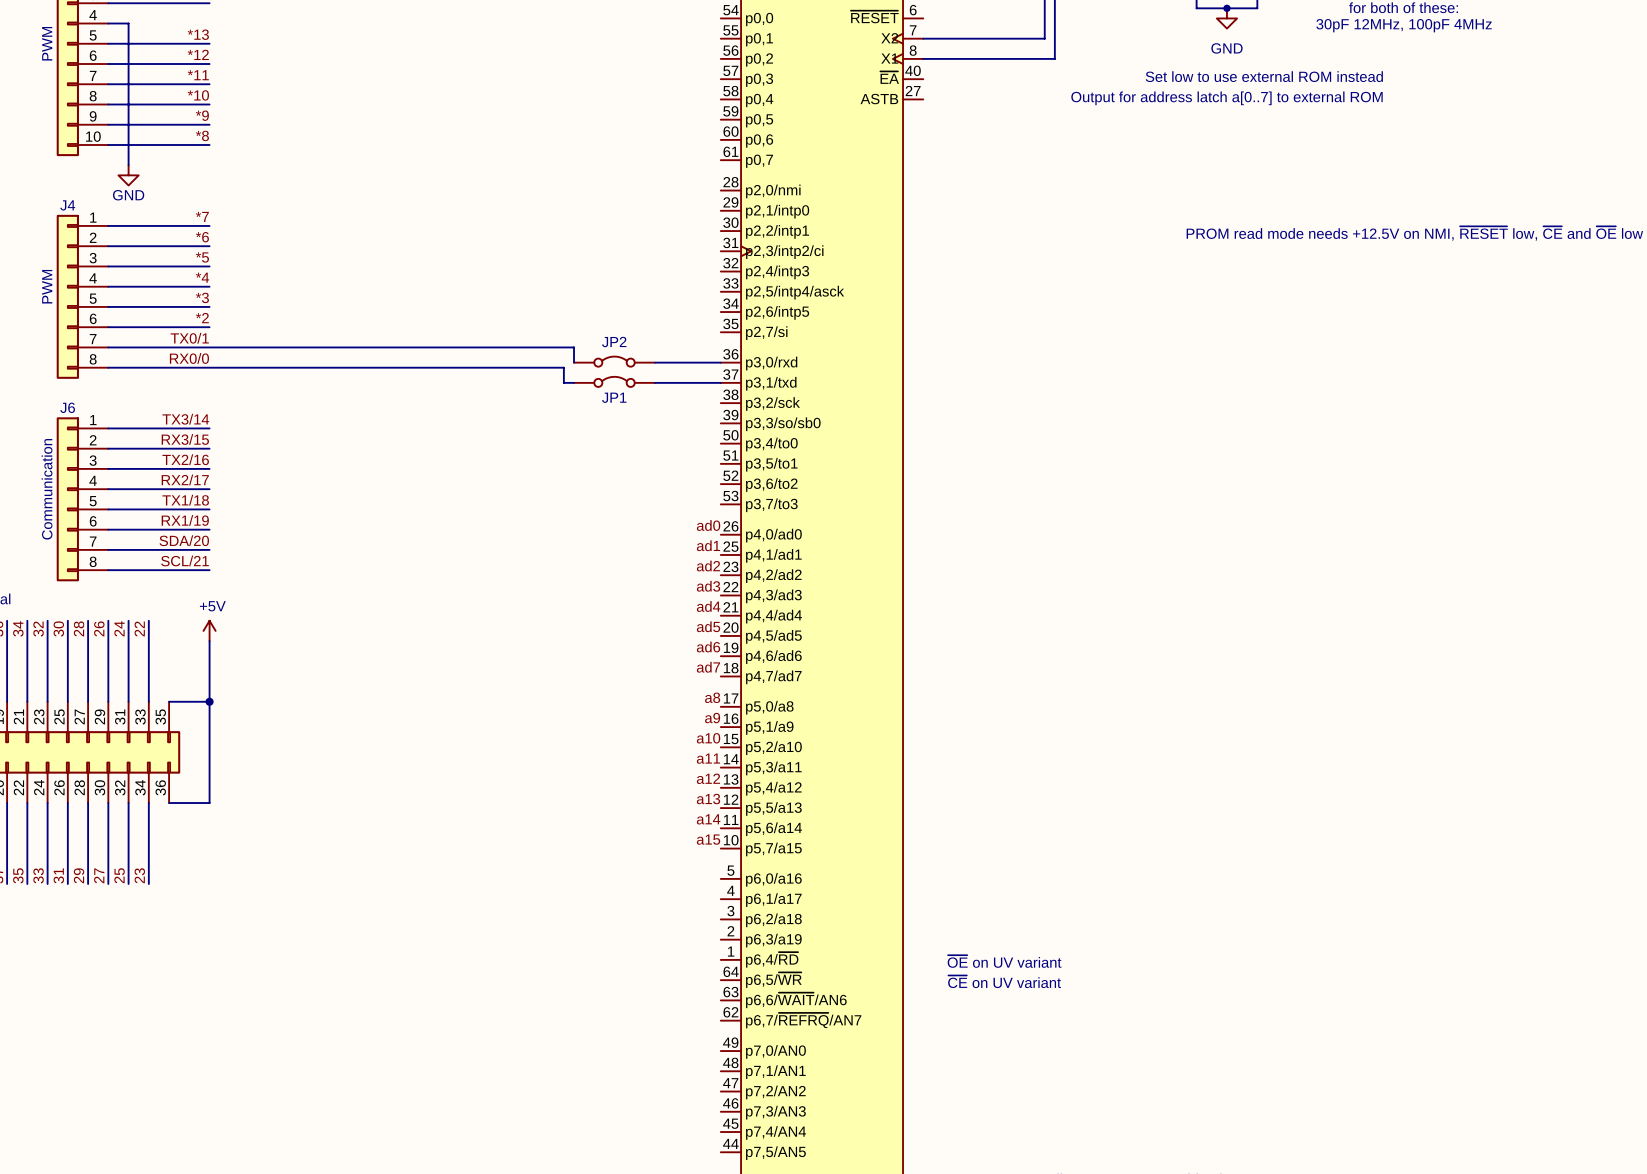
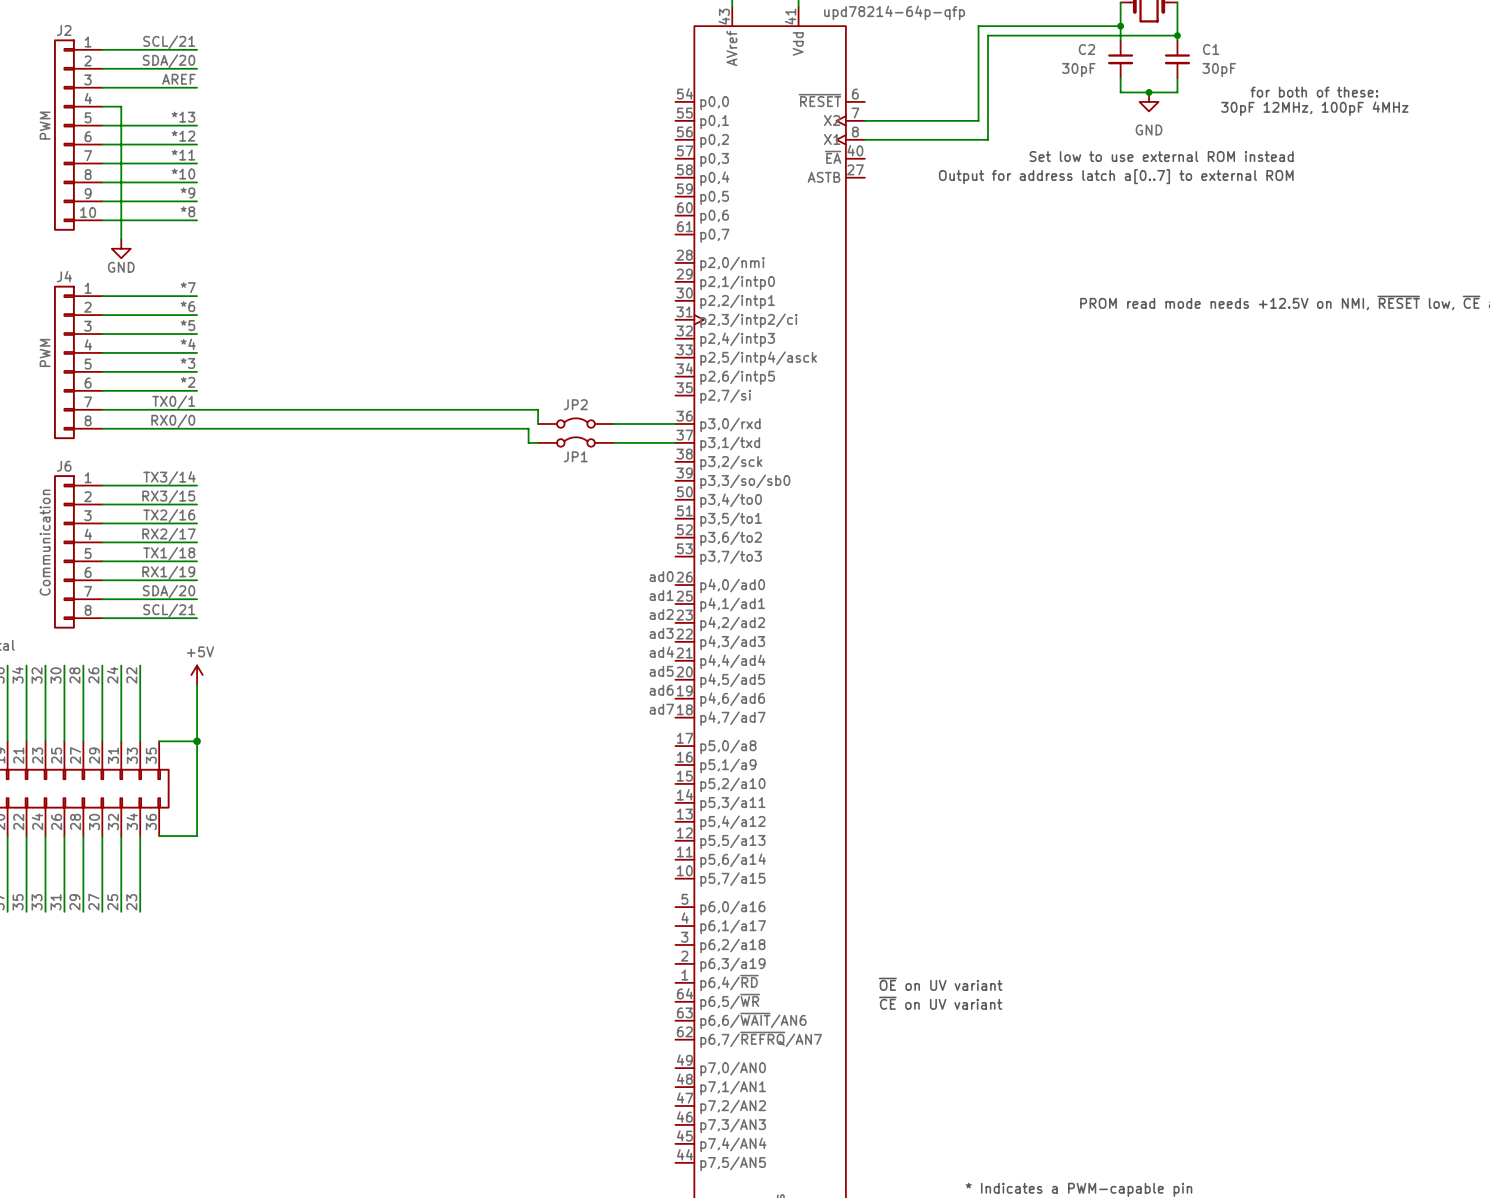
label: a8 (712, 697) -> none
label: a9 (712, 718) -> none
label: a10 (708, 738) -> none
label: a11 (708, 758) -> none
label: a12 (708, 778) -> none
label: a13 (708, 799) -> none
label: a14 (708, 819) -> none
label: a15 (708, 839) -> none

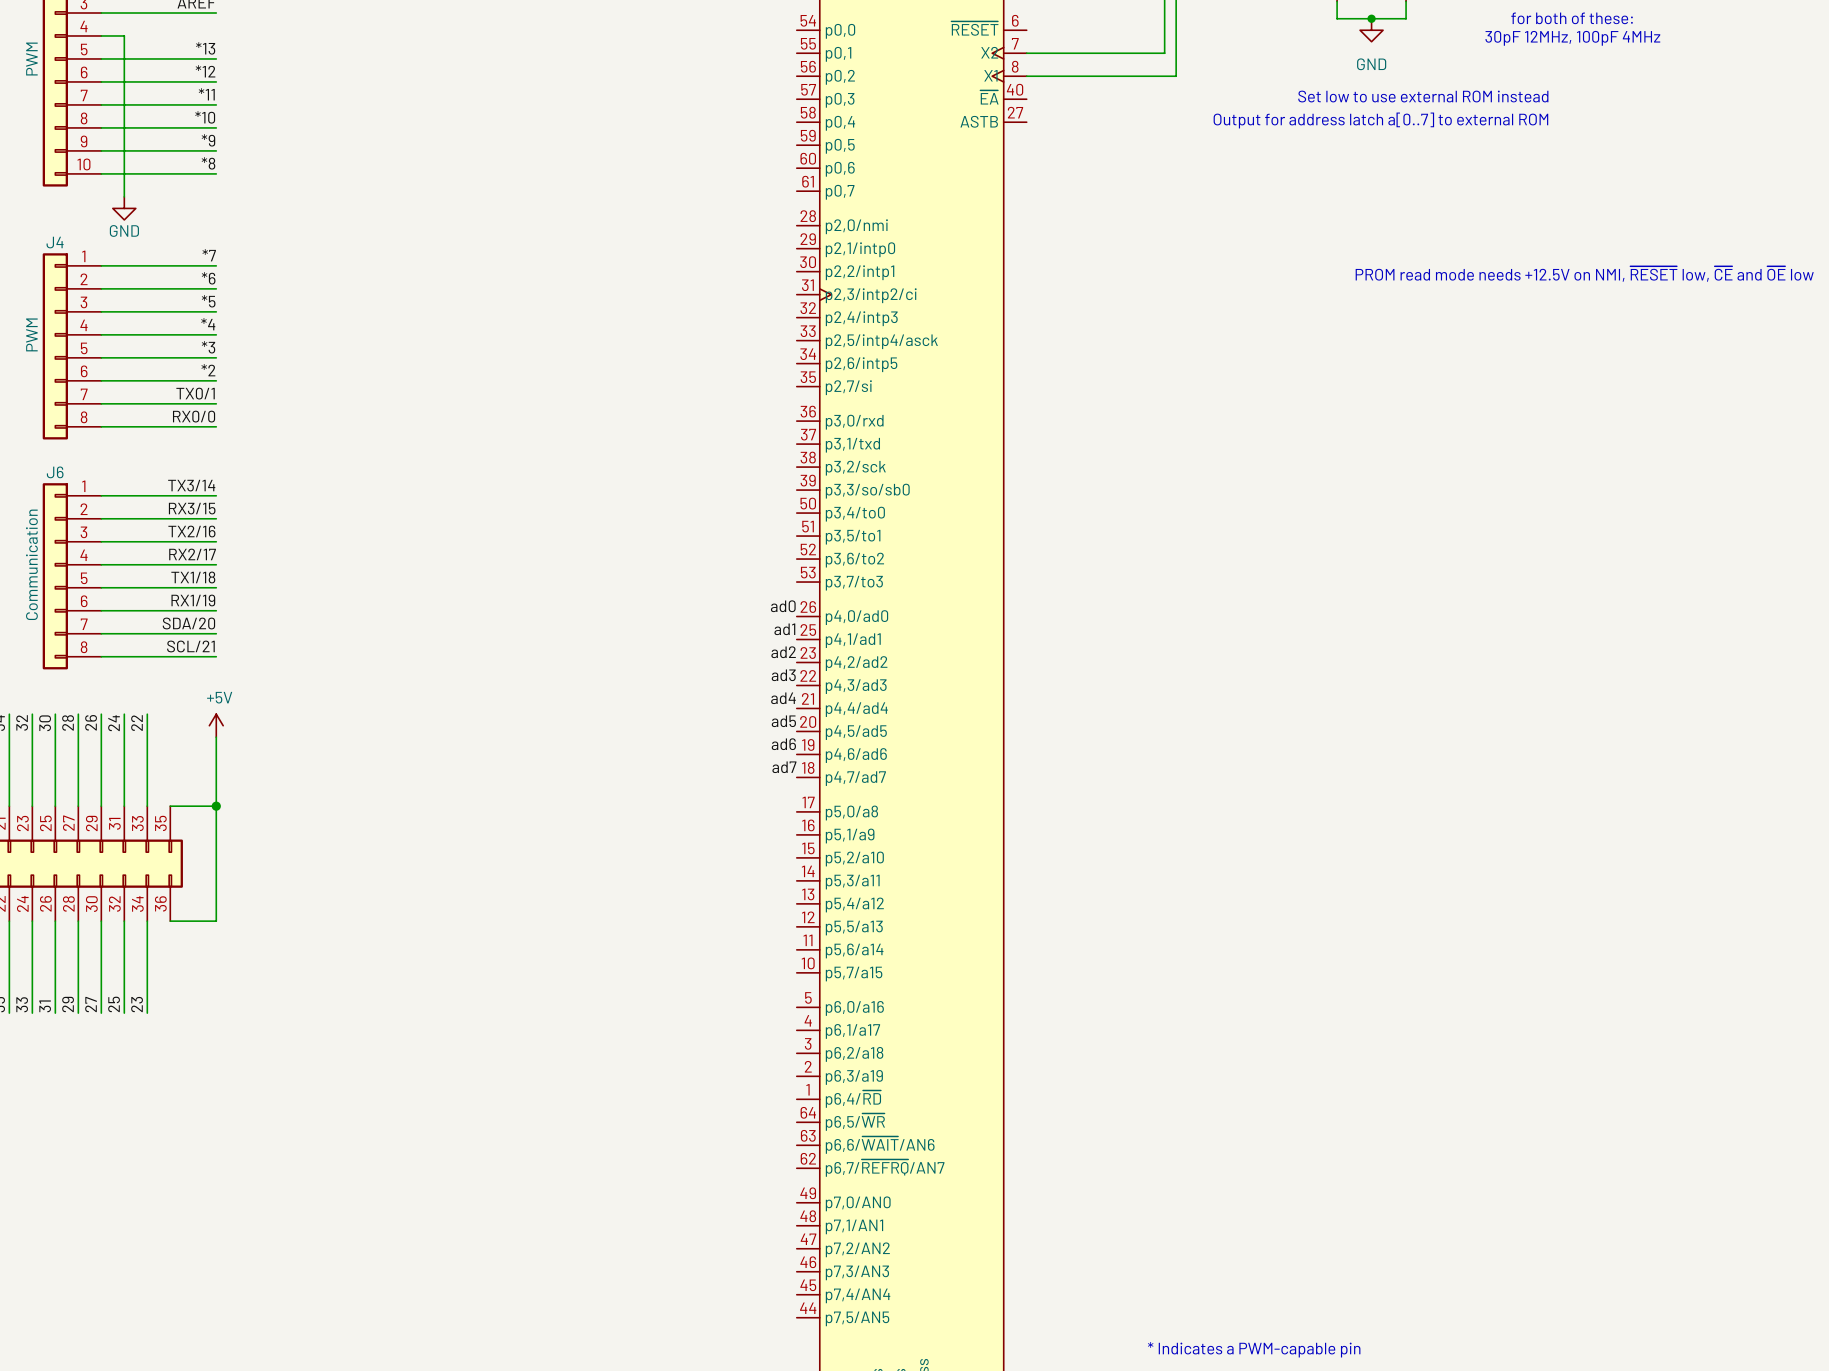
wire: (197, 409) (538, 409) (538, 423) -> none
JP2: (575, 423) -> none
wire: (613, 423) (675, 423) -> none
wire: (197, 428) (528, 428) (528, 442) (538, 442) -> none
JP1: (575, 441) -> none
wire: (613, 442) (675, 442) -> none
text: ~{OE} on UV variant (940, 984) -> none
text: ~{CE} on UV variant (940, 1003) -> none

